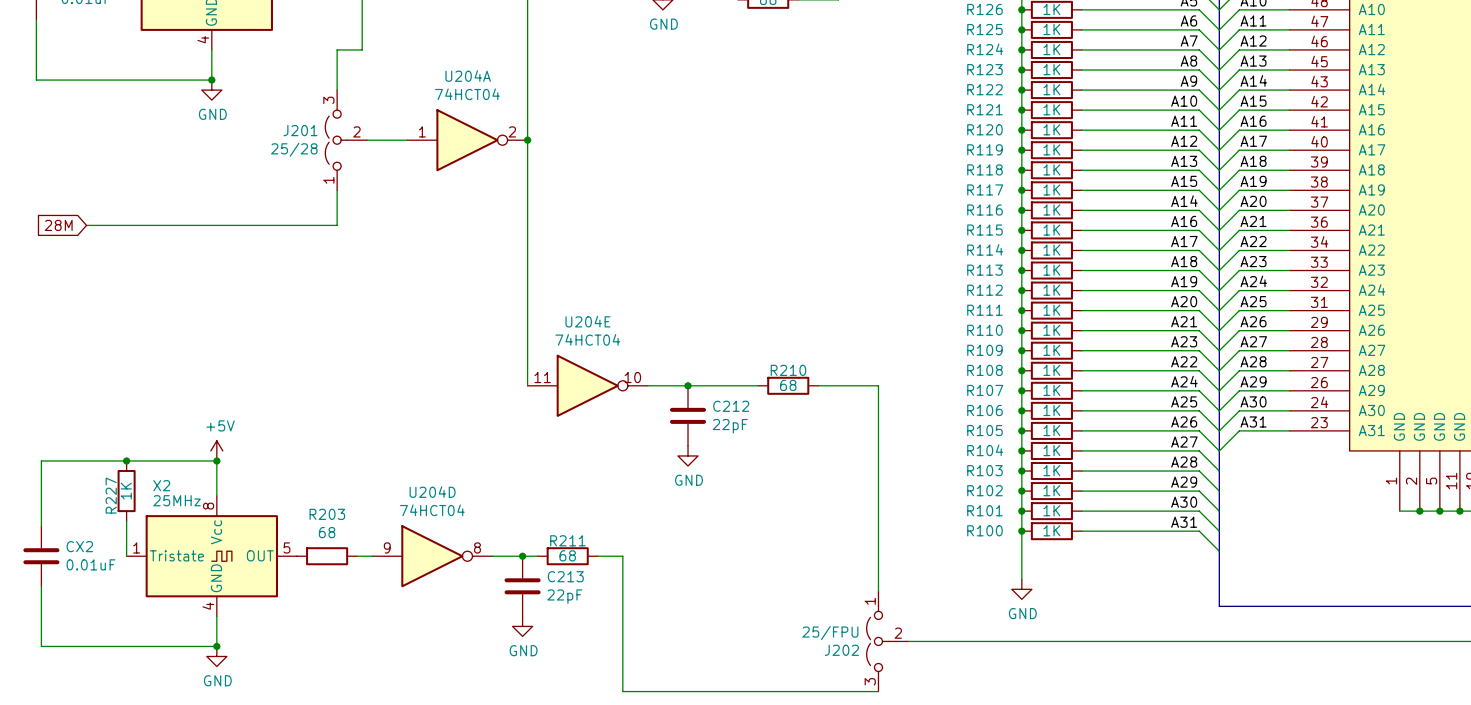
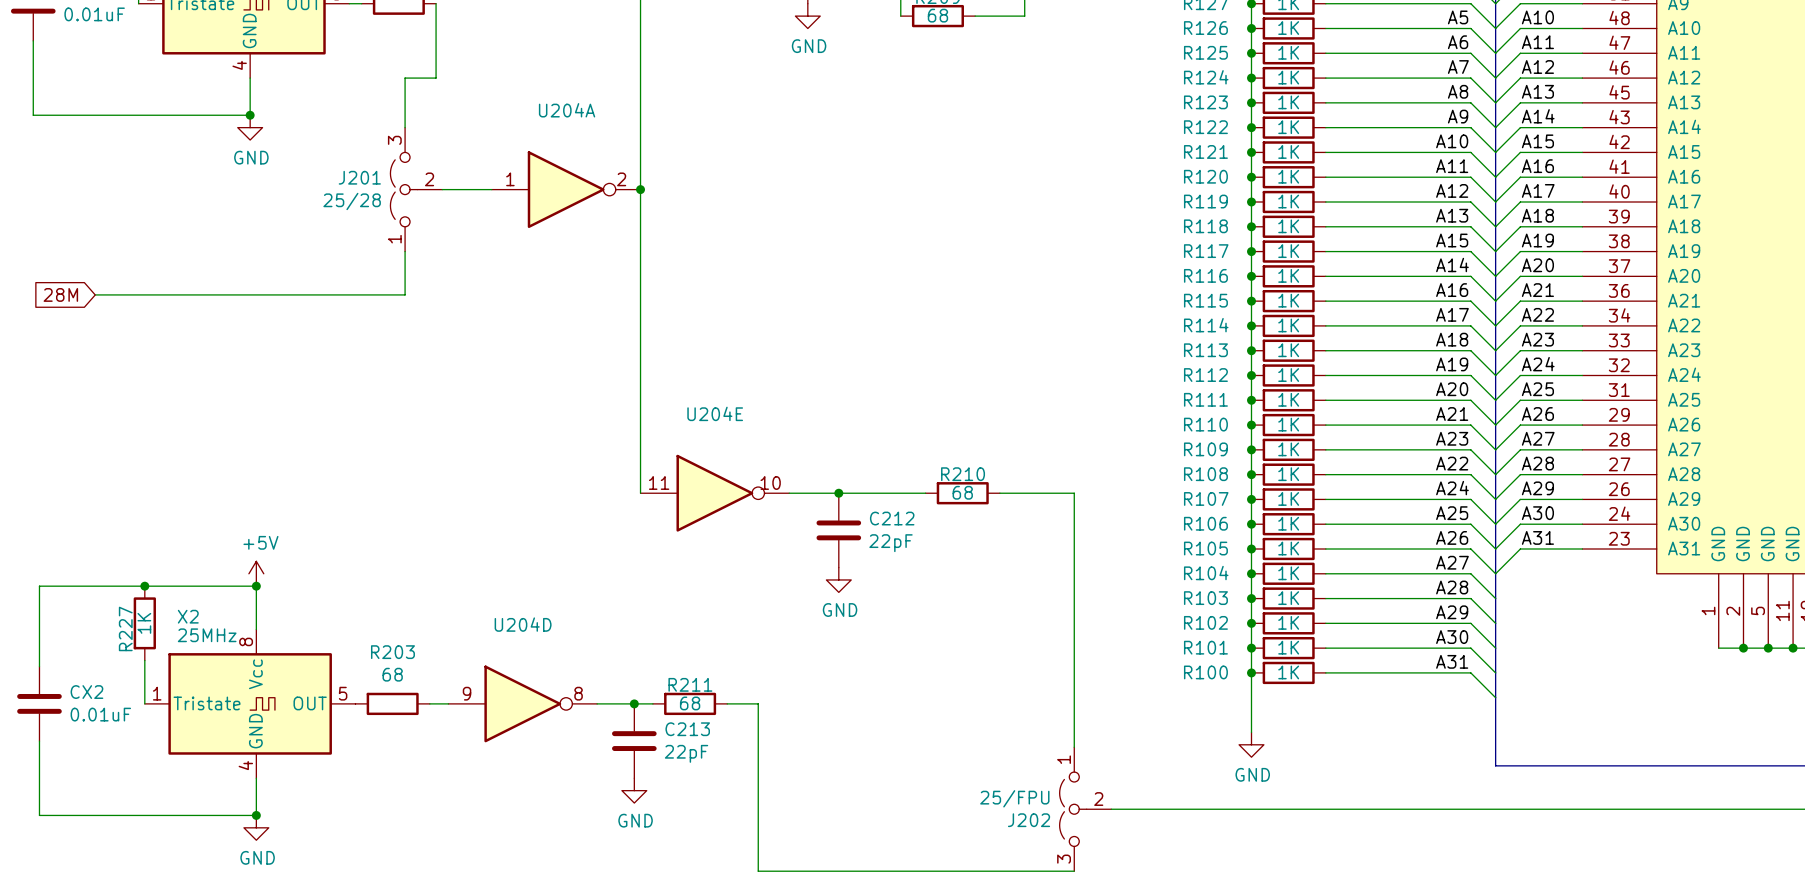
U204A value: 74HCT04 (467, 94) -> none
U204E value: 74HCT04 (587, 339) -> none
U204D value: 74HCT04 (432, 510) -> none

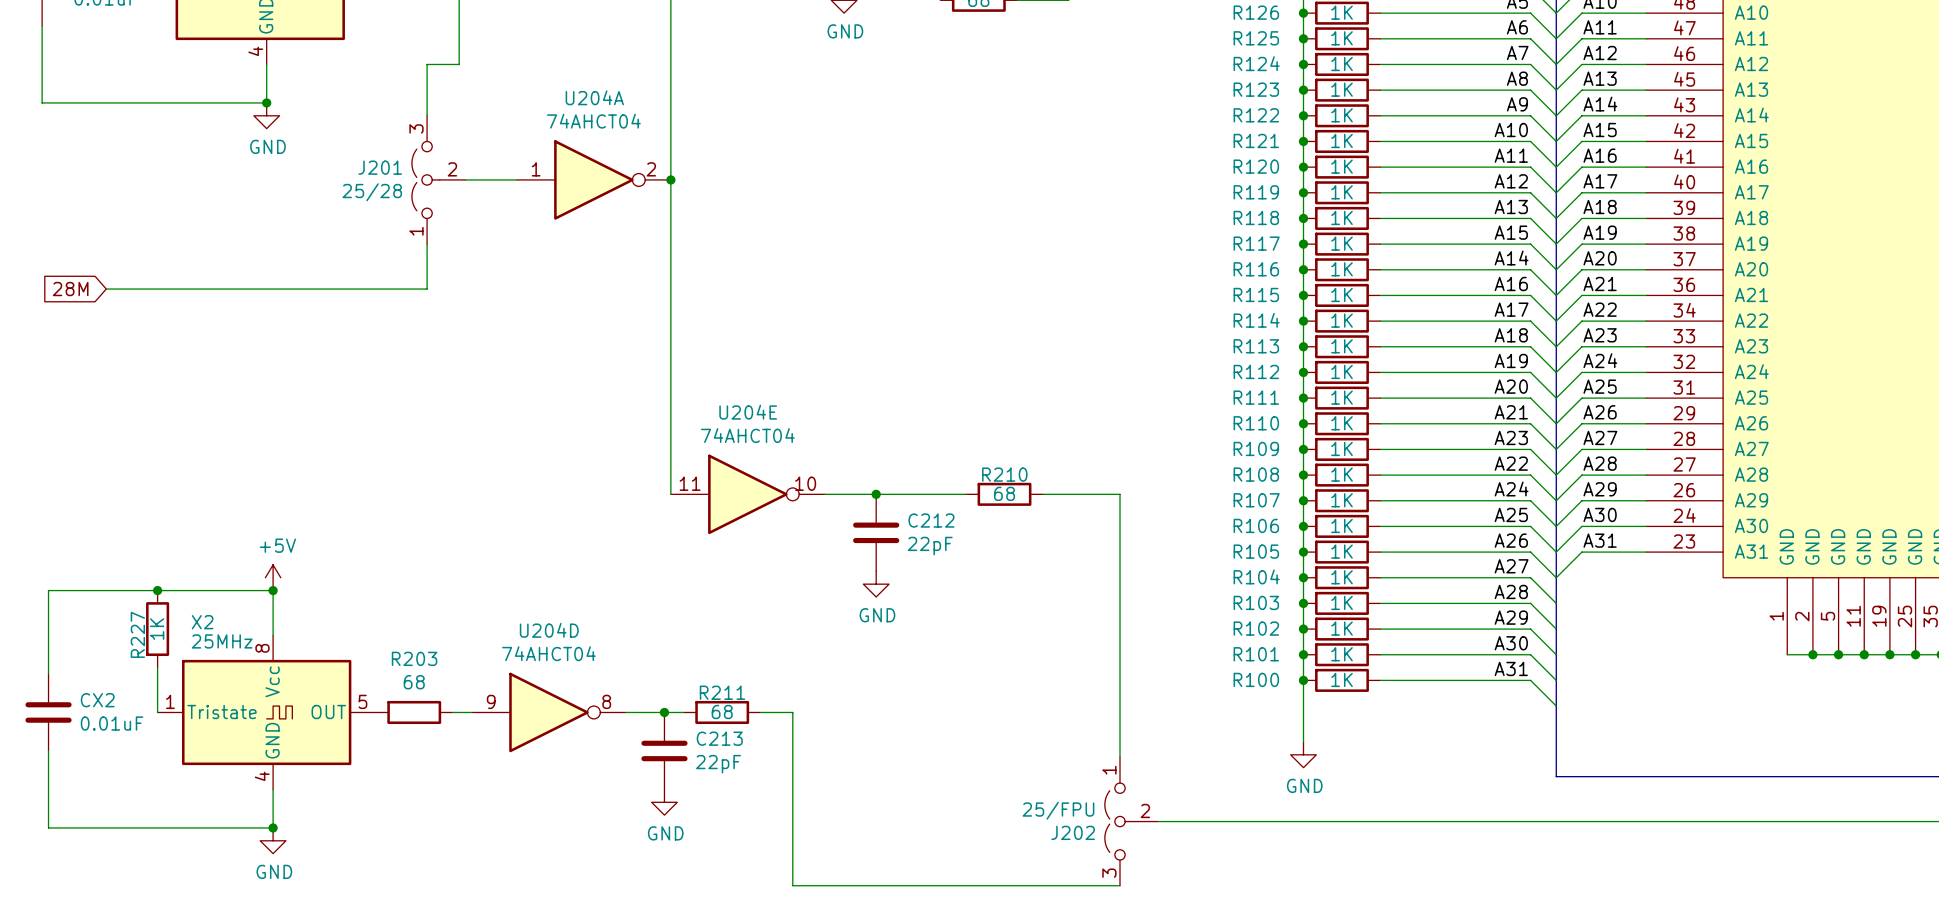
U204A value: none -> 74AHCT04 (593, 121)
U204E value: none -> 74AHCT04 (747, 435)
U204D value: none -> 74AHCT04 (548, 653)

